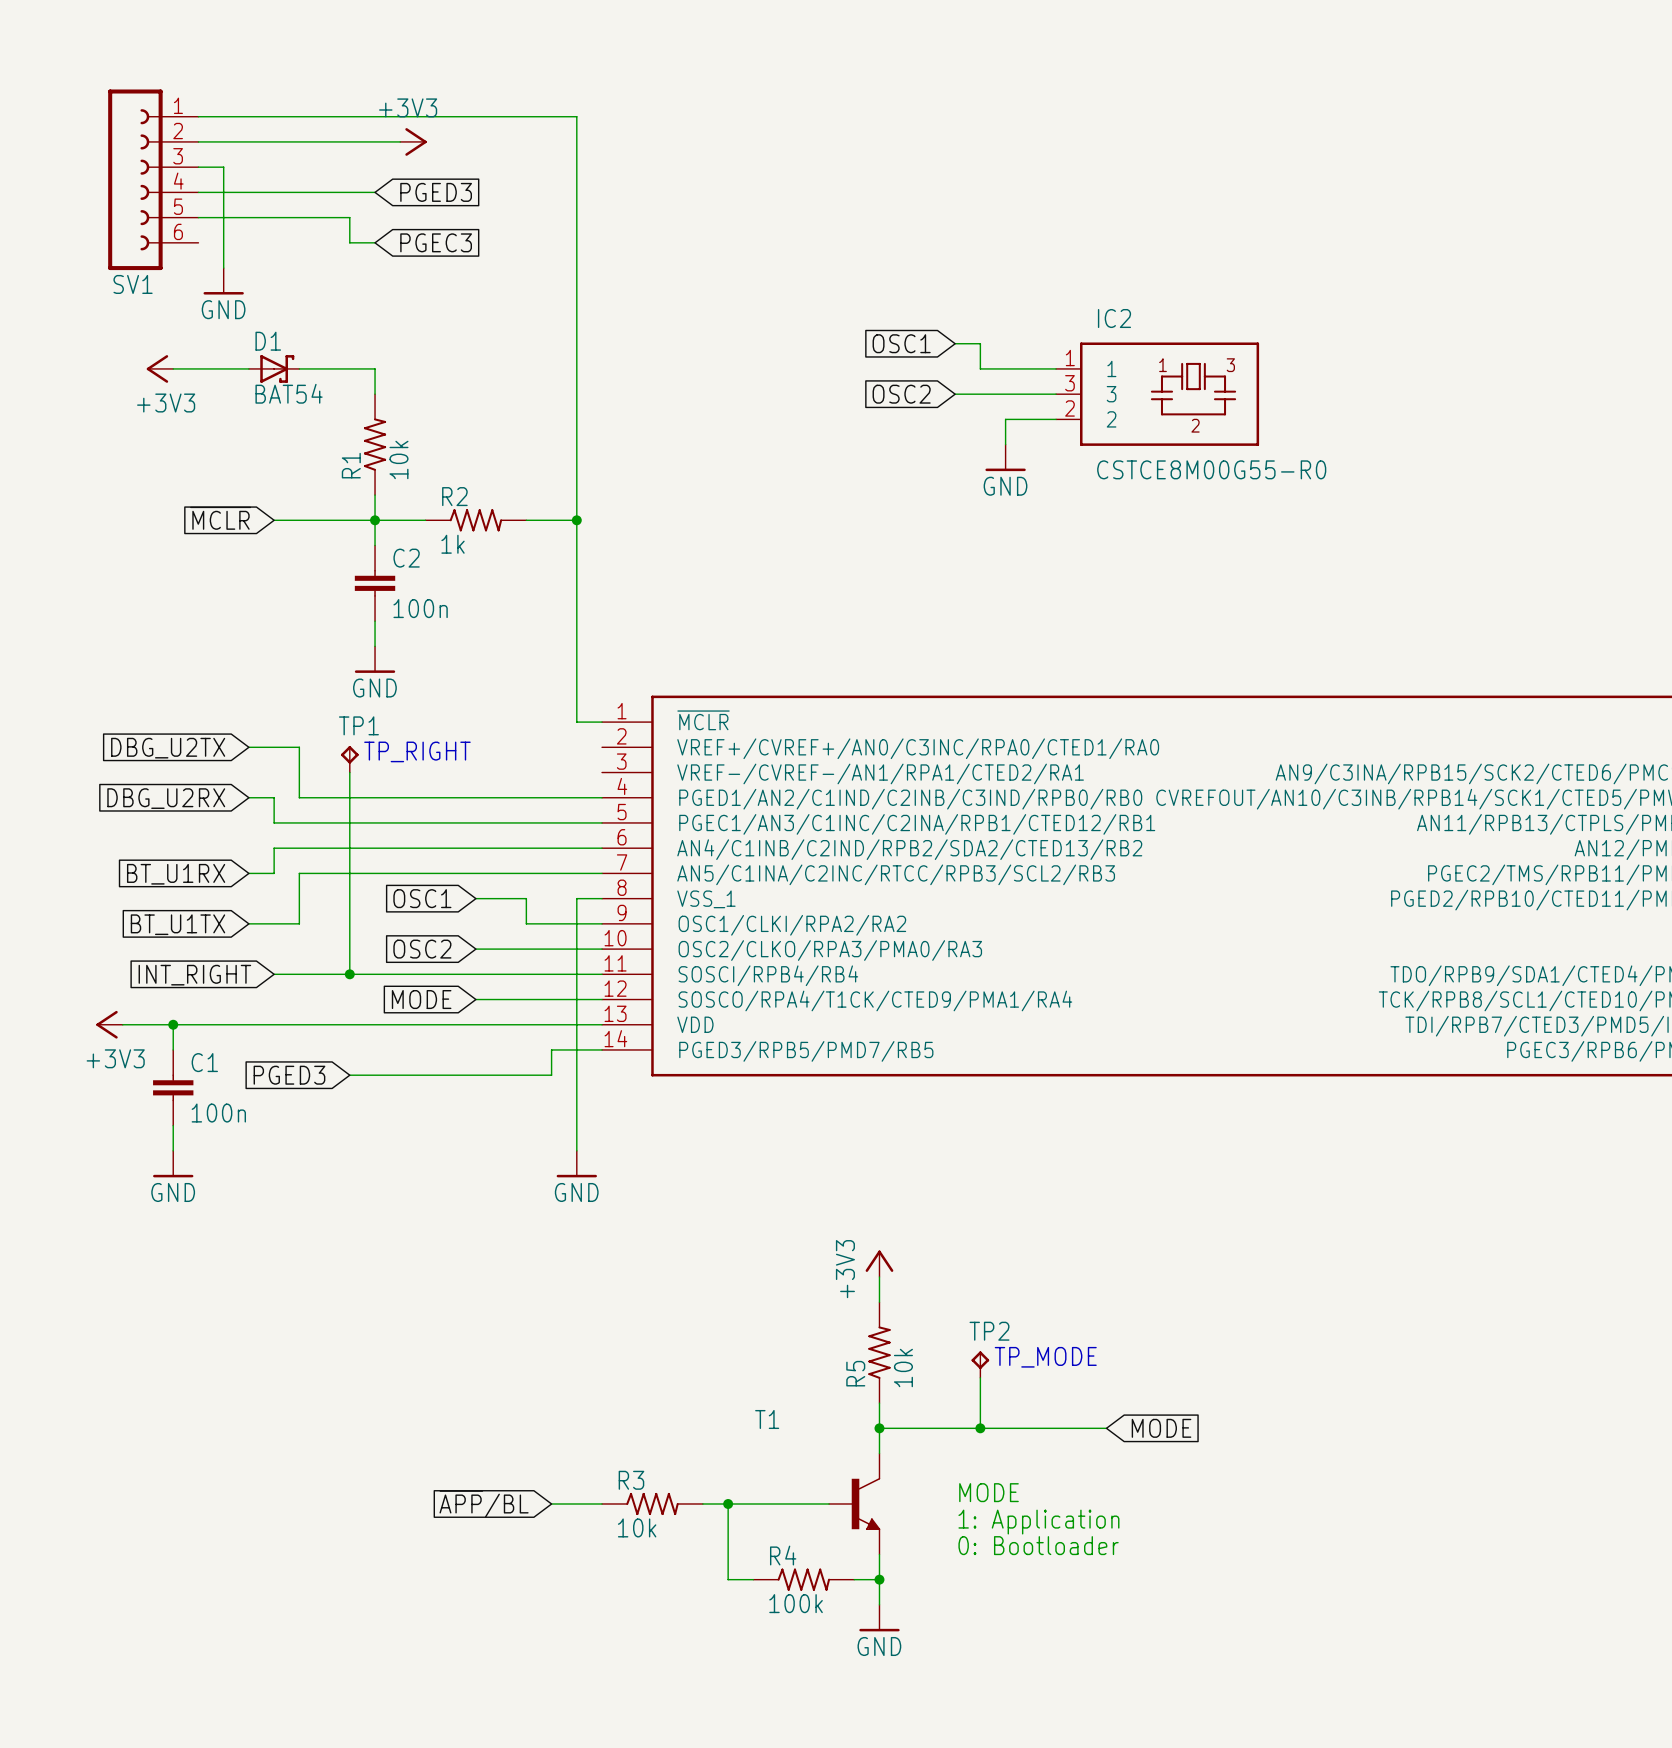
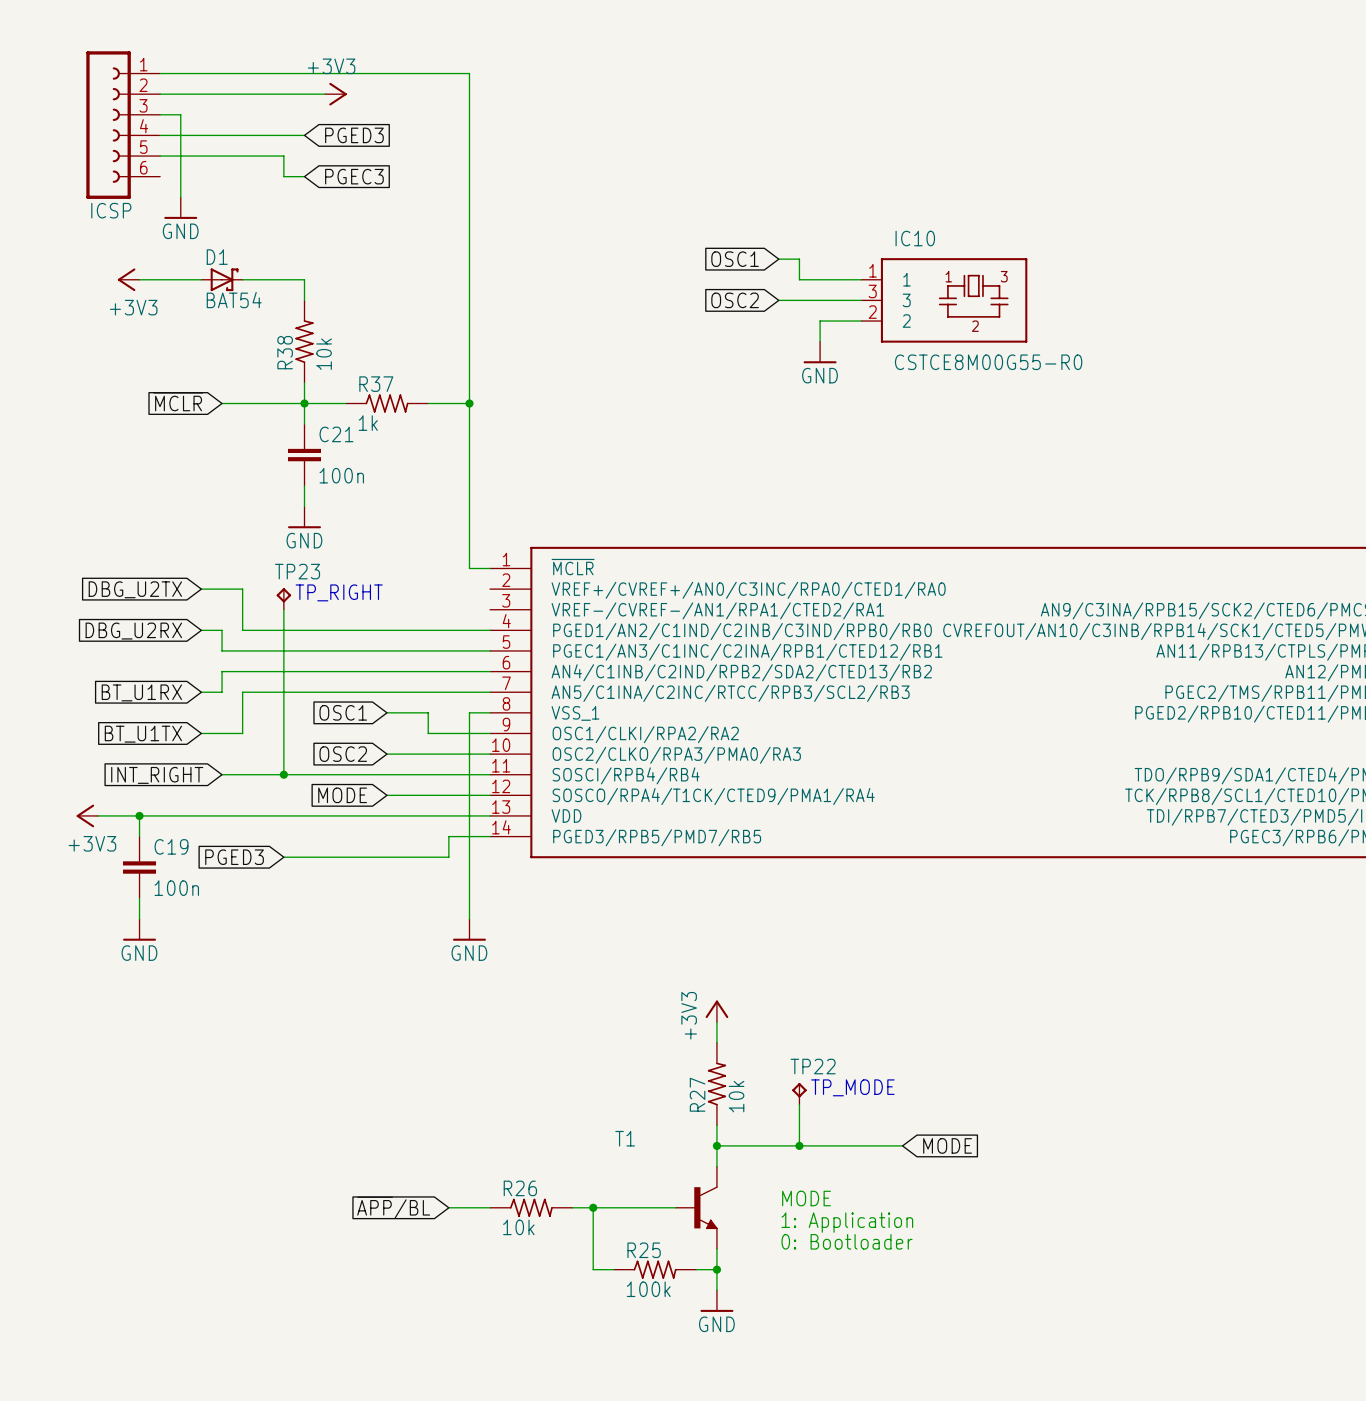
SV1 name: SV1 (133, 284) -> ICSP (111, 210)
IC2 name: IC2 (1114, 318) -> IC10 (915, 238)
R1 name: R1 (351, 465) -> R38 (285, 352)
R2 name: R2 (454, 496) -> R37 (376, 384)
C2 name: C2 (406, 558) -> C21 (336, 434)
TP1 name: TP1 (358, 725) -> TP23 (297, 571)
C1 name: C1 (204, 1062) -> C19 (171, 846)
TP2 name: TP2 (989, 1331) -> TP22 (813, 1066)
R5 name: R5 (855, 1373) -> R27 (697, 1094)
R3 name: R3 (631, 1480) -> R26 (520, 1188)
R4 name: R4 (783, 1555) -> R25 (644, 1250)

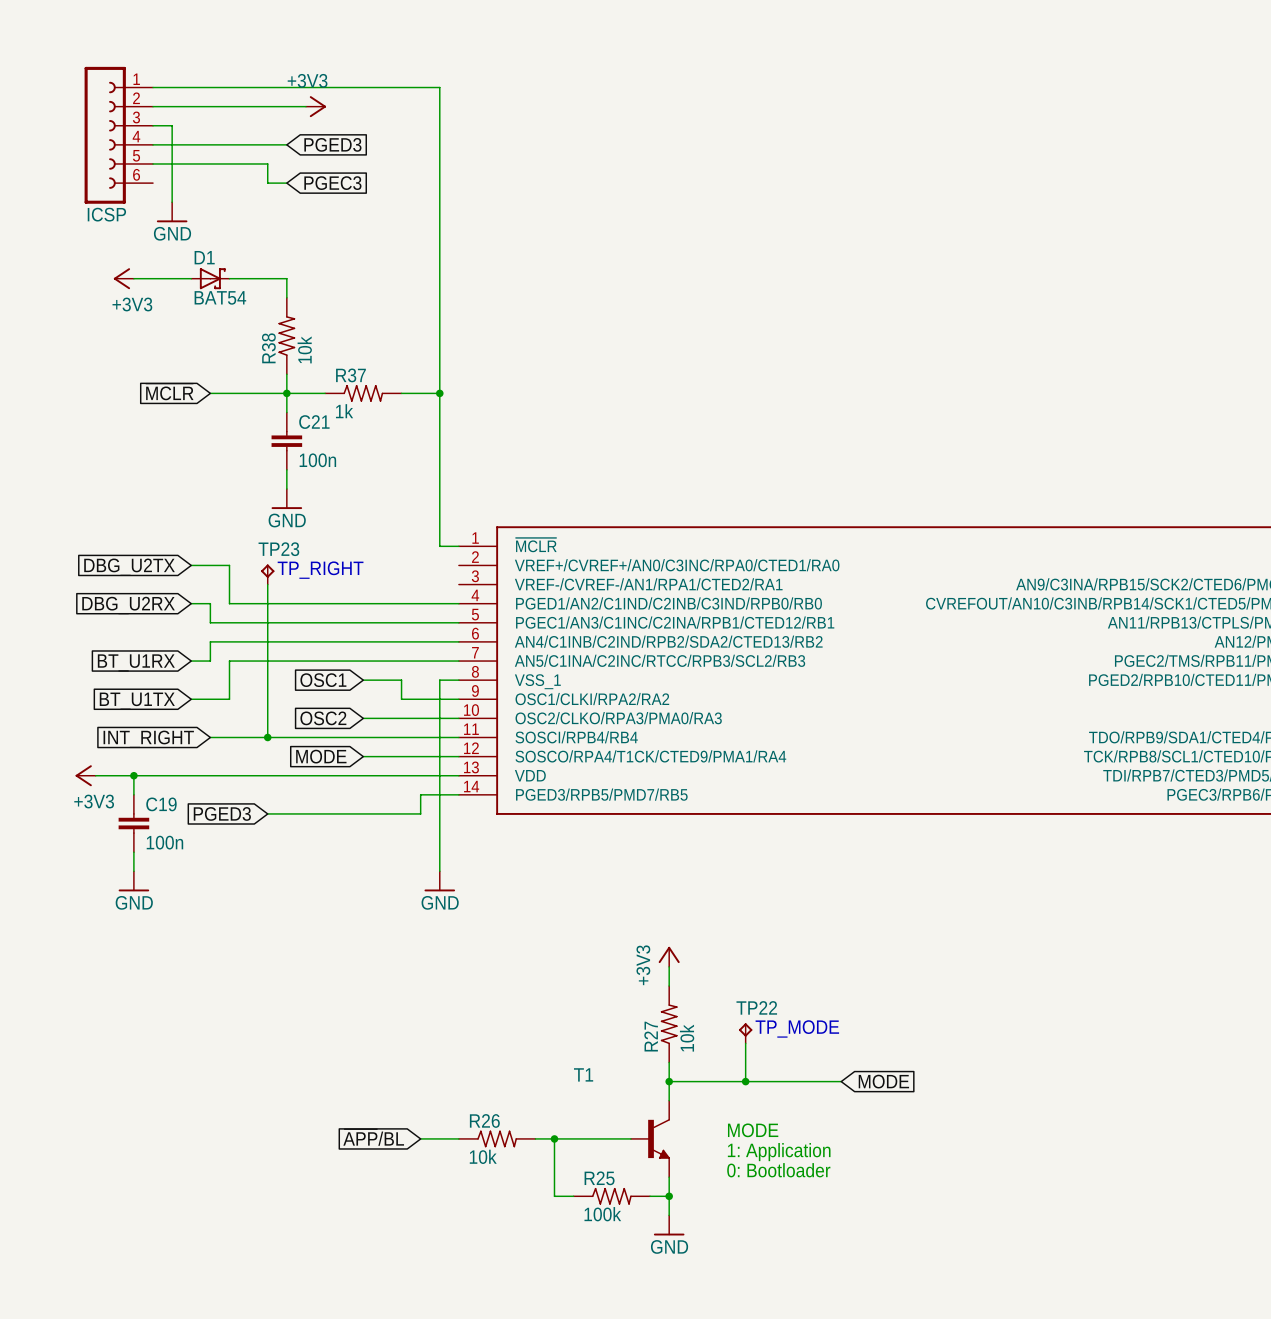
global label: OSC1 (735, 259) -> none
wire: (778, 259) (799, 259) (799, 279) (861, 279) -> none
global label: OSC2 (735, 300) -> none
wire: (778, 300) (861, 300) -> none
IC10: CSTCE8M00G55-R0 (944, 300) -> none
wire: (861, 321) (820, 321) (820, 341) -> none
power symbol: GND (820, 352) -> none

